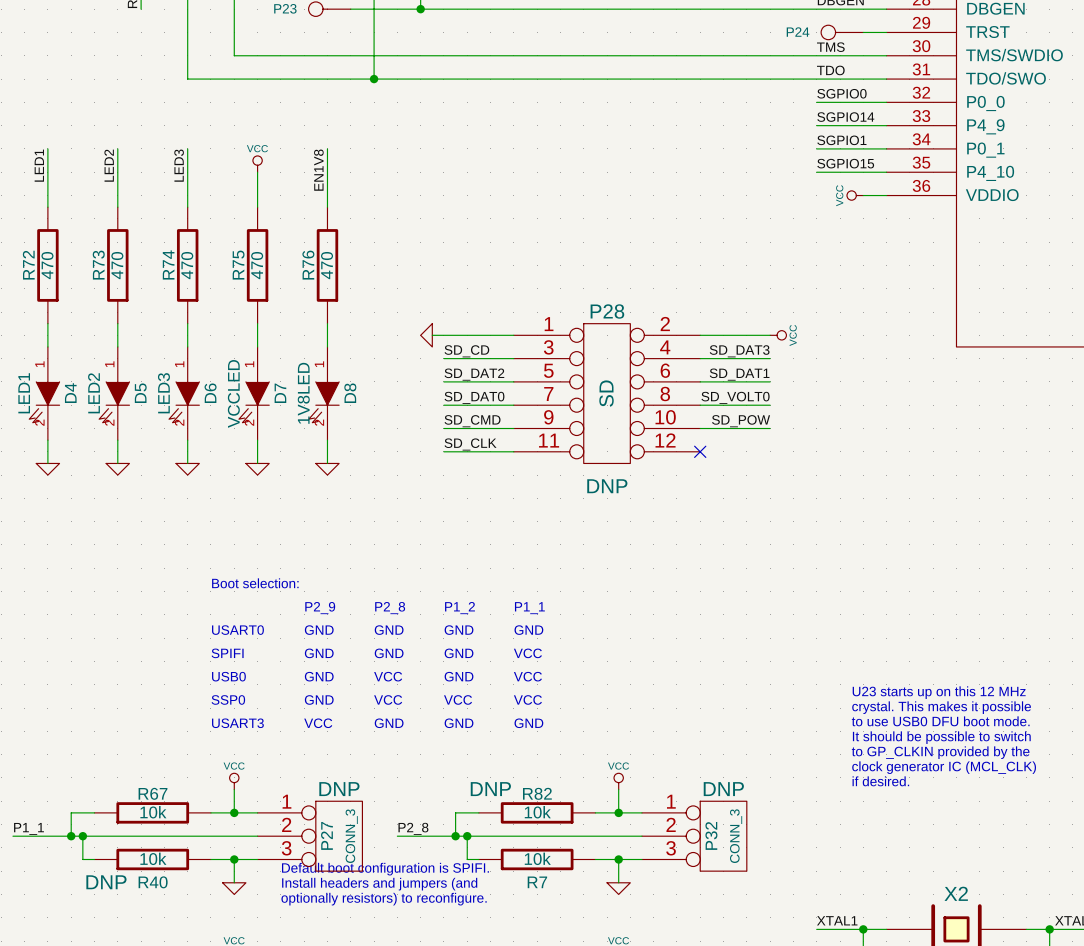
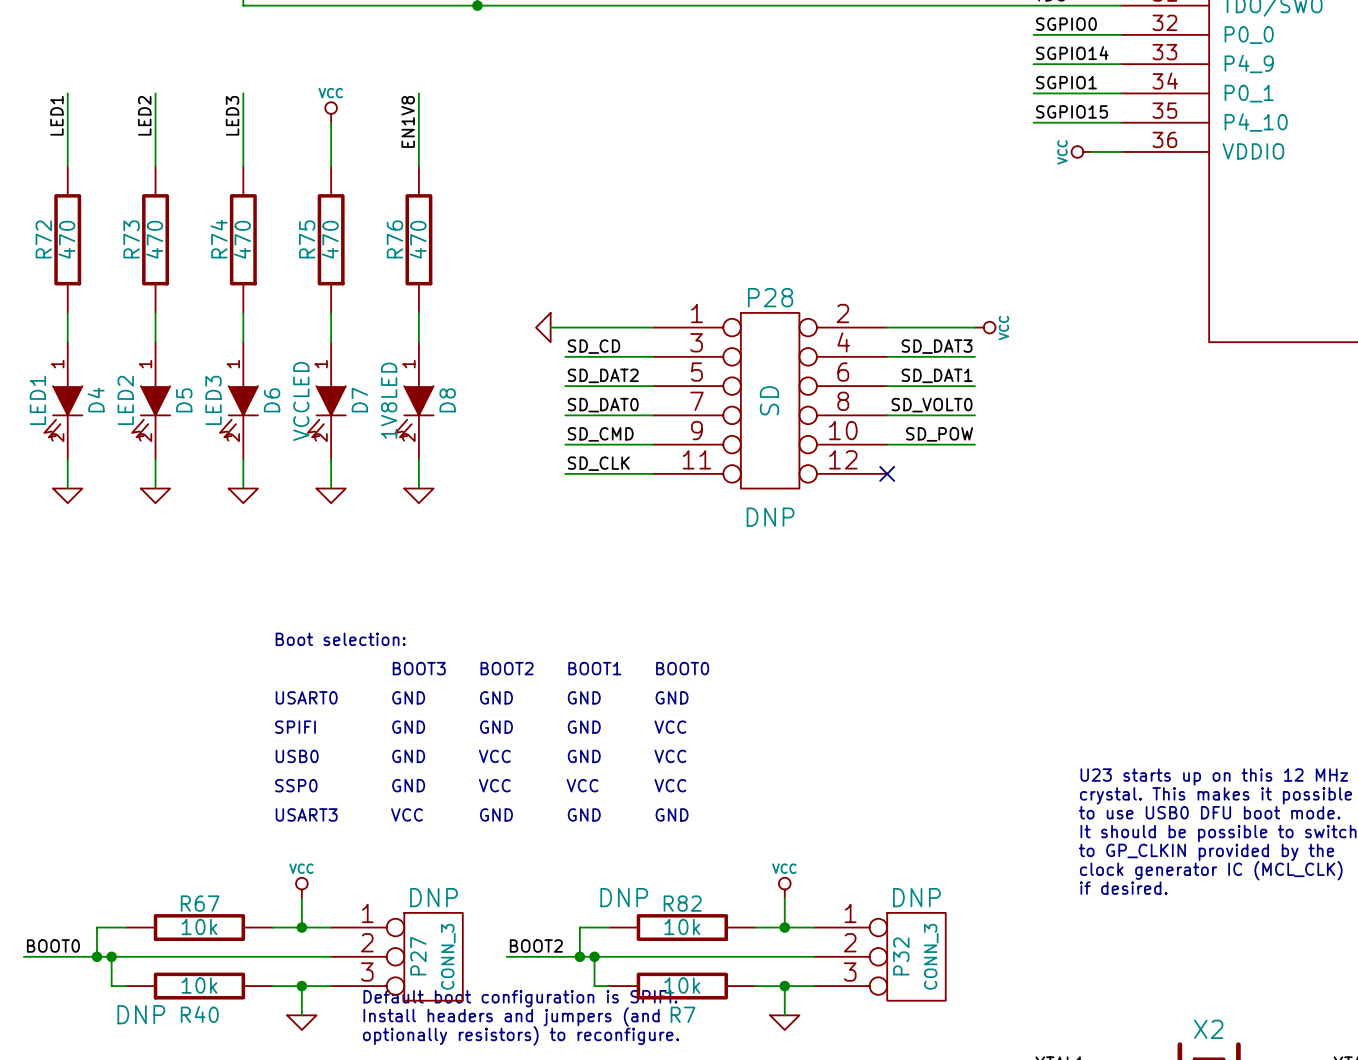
text: P2_9 (320, 608) -> BOOT3 (419, 668)
text: P2_8 (390, 608) -> BOOT2 (507, 668)
text: P1_2 (459, 608) -> BOOT1 (594, 668)
text: P1_1 (529, 608) -> BOOT0 (682, 668)
label: P1_1 (29, 828) -> BOOT0 (53, 946)
label: P2_8 (413, 828) -> BOOT2 (536, 946)

